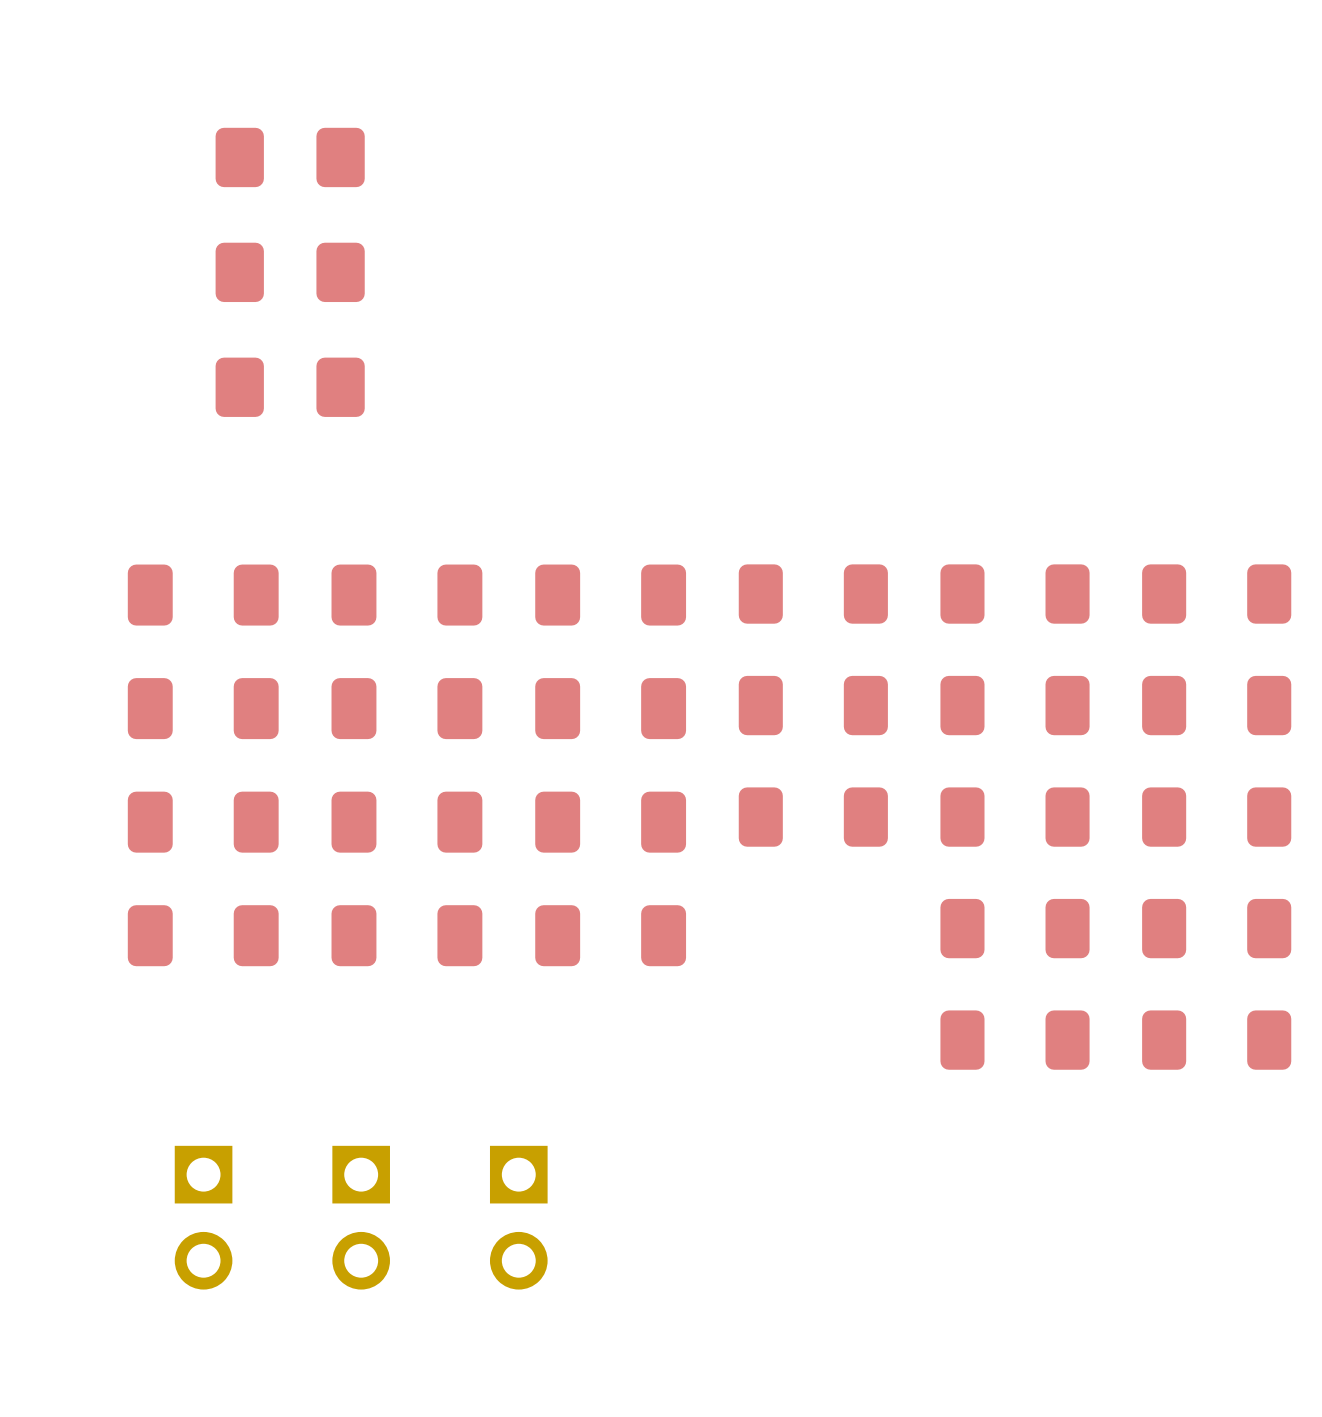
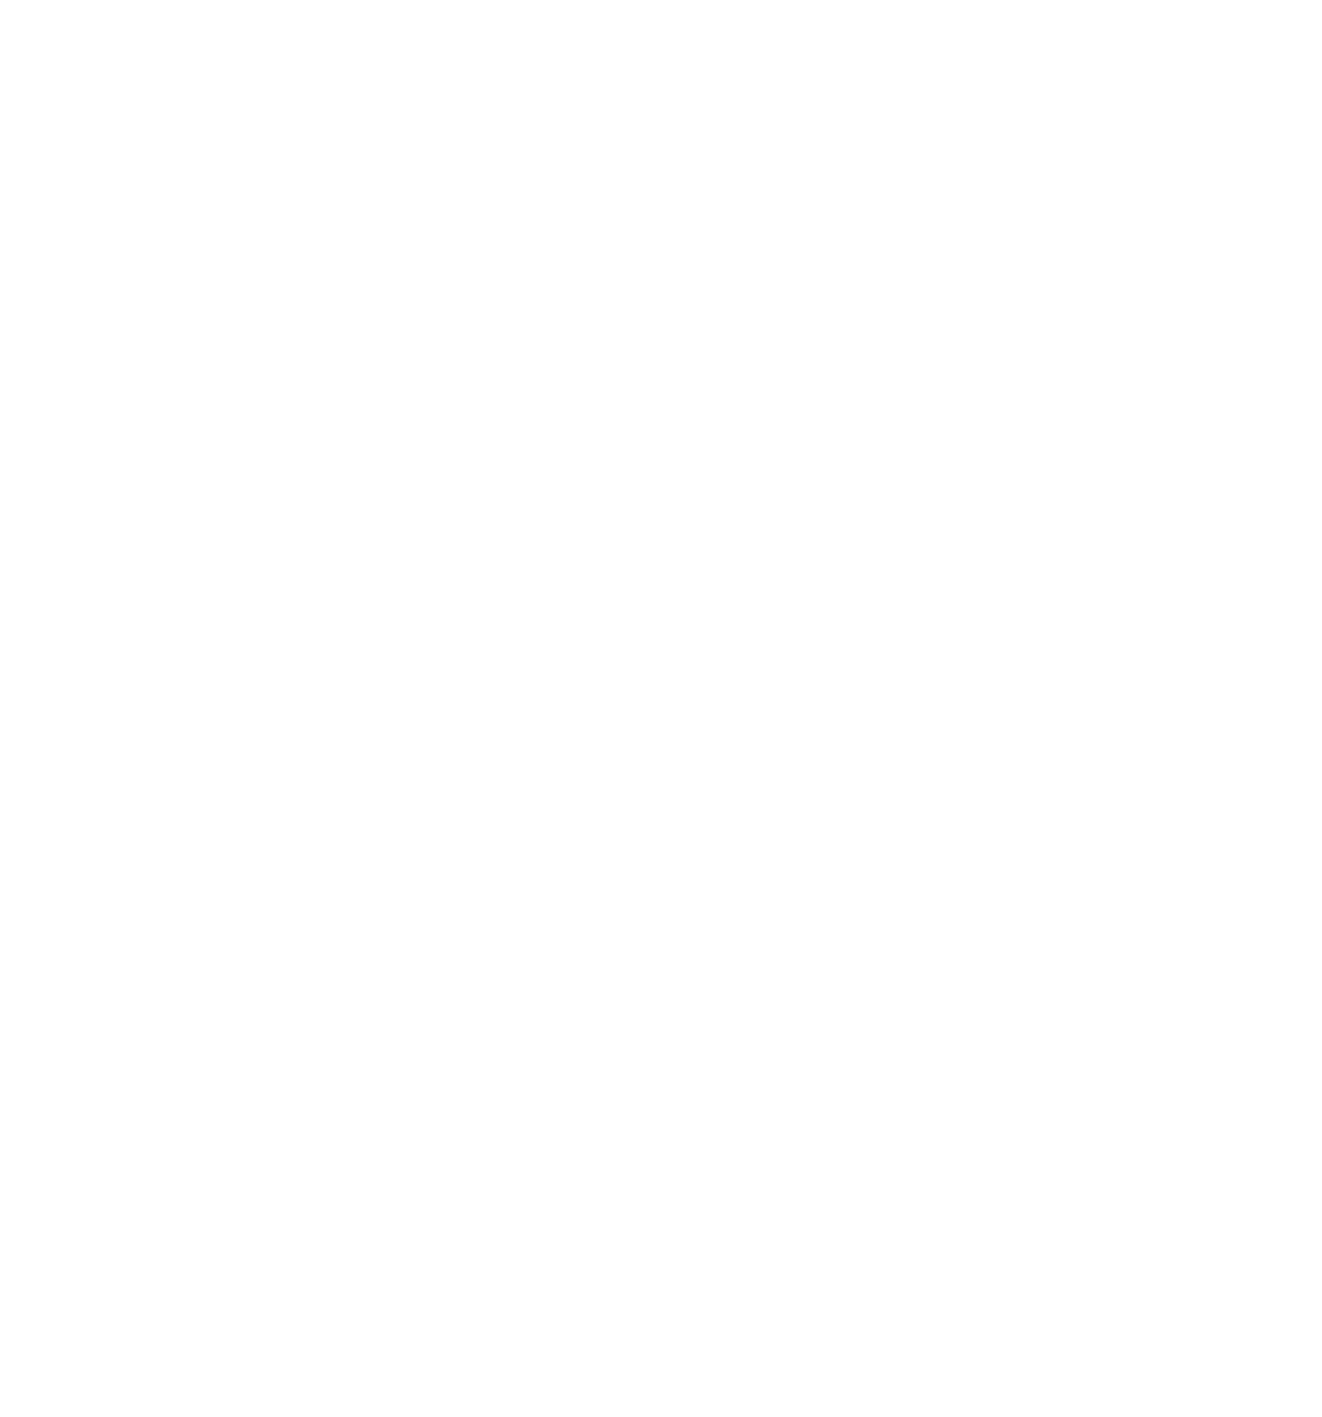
part: (290, 157) -> none
part: (290, 272) -> none
part: (290, 387) -> none
part: (813, 594) -> none
part: (1015, 594) -> none
part: (1216, 594) -> none
part: (203, 595) -> none
part: (406, 595) -> none
part: (610, 595) -> none
part: (813, 705) -> none
part: (1015, 705) -> none
part: (1216, 705) -> none
part: (203, 708) -> none
part: (406, 708) -> none
part: (610, 708) -> none
part: (813, 817) -> none
part: (1015, 817) -> none
part: (1216, 817) -> none
part: (203, 822) -> none
part: (406, 822) -> none
part: (610, 822) -> none
part: (1015, 928) -> none
part: (1216, 928) -> none
part: (203, 935) -> none
part: (406, 935) -> none
part: (610, 935) -> none
part: (1015, 1040) -> none
part: (1216, 1040) -> none
part: (203, 1217) -> none
part: (361, 1217) -> none
part: (518, 1217) -> none

